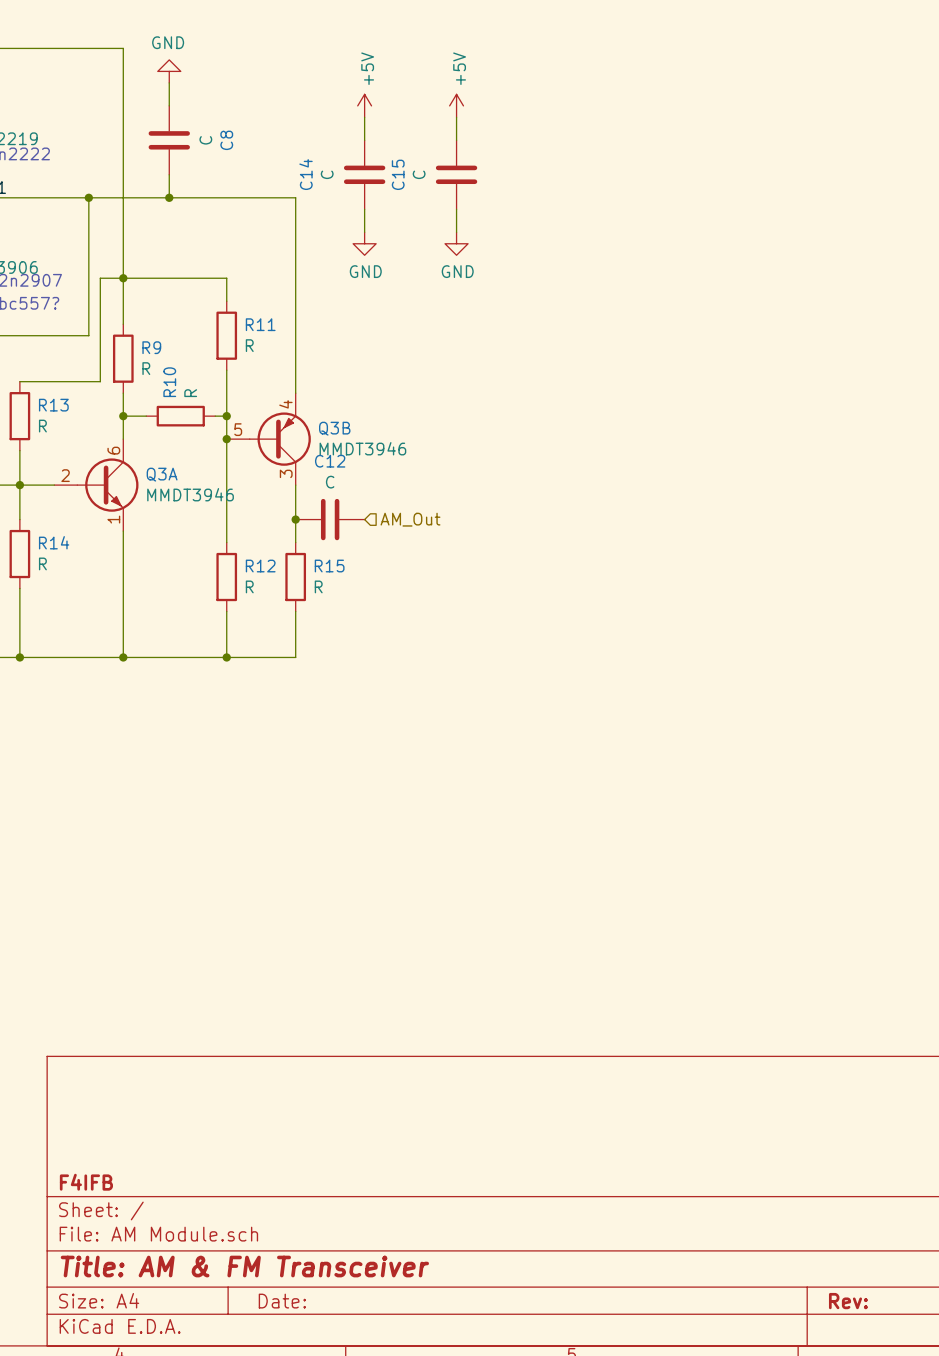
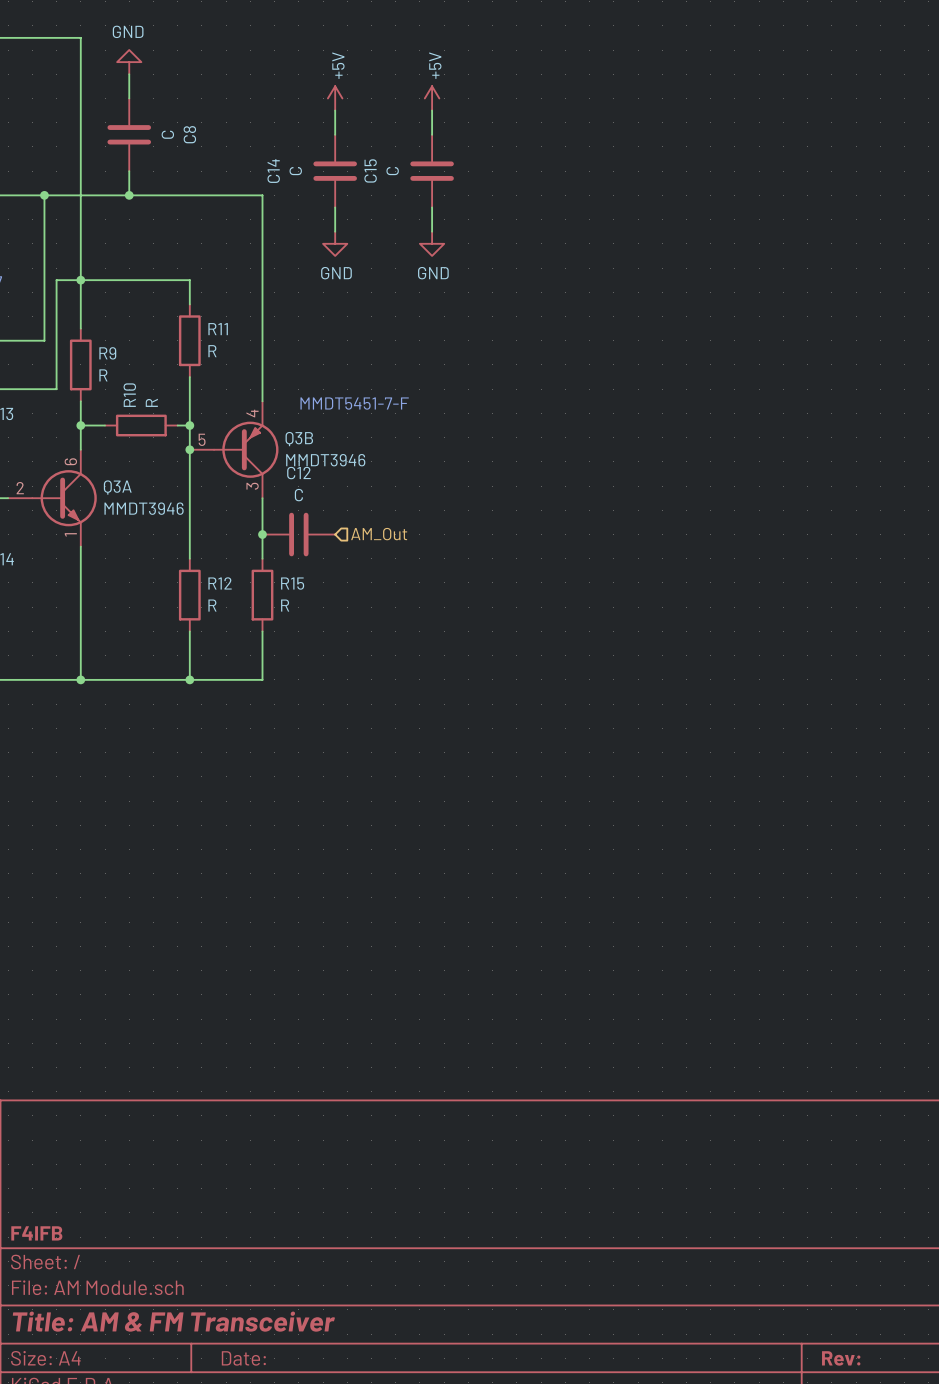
text: none -> MMDT5451-7-F (354, 403)

